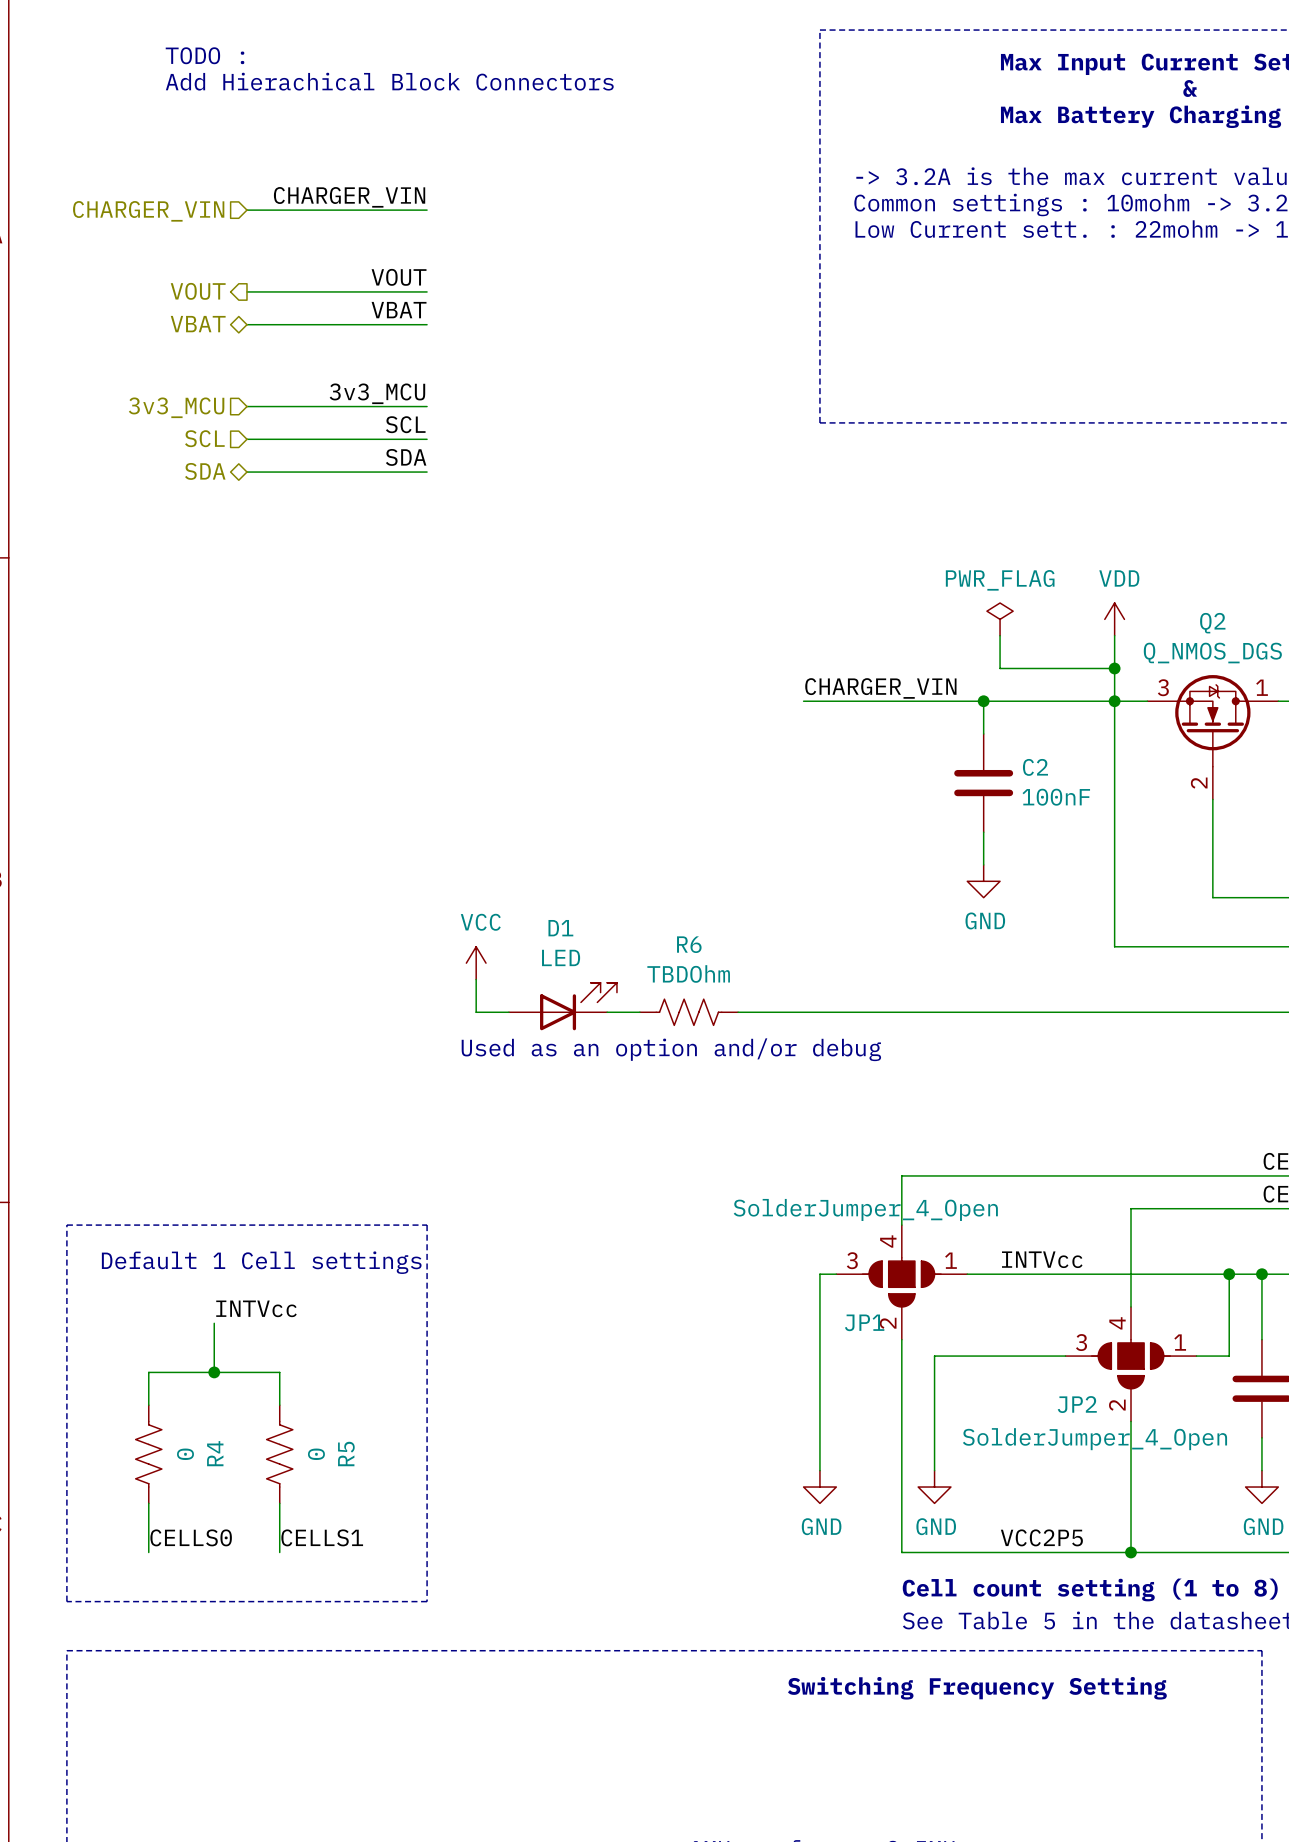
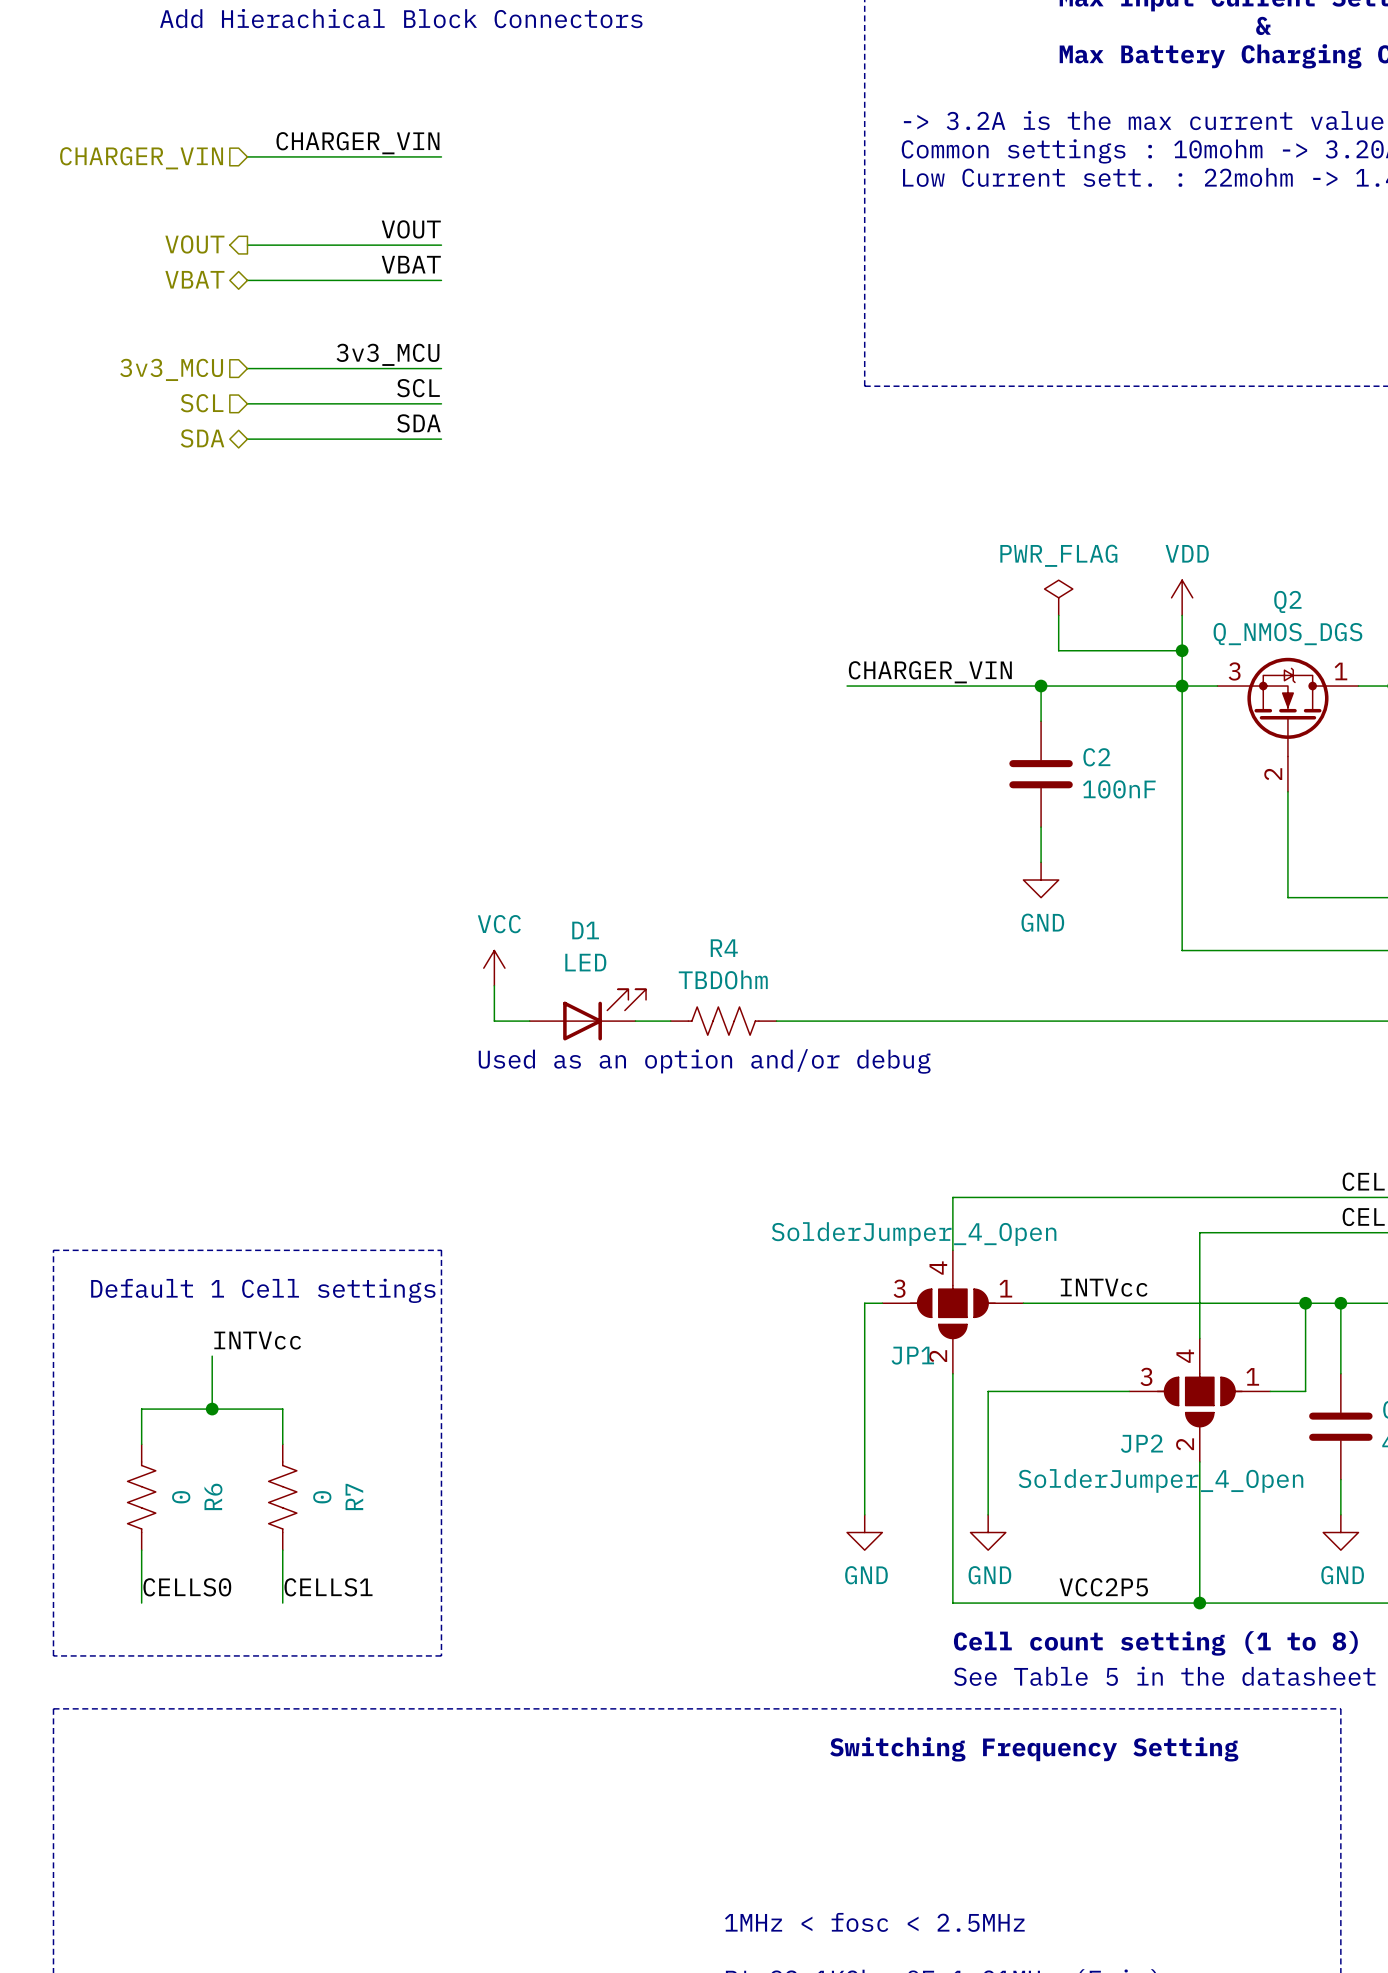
R6 name: R6 (689, 944) -> R4 (724, 948)
R4 name: R4 (215, 1453) -> R6 (213, 1496)
R5 name: R5 (346, 1454) -> R7 (354, 1496)

